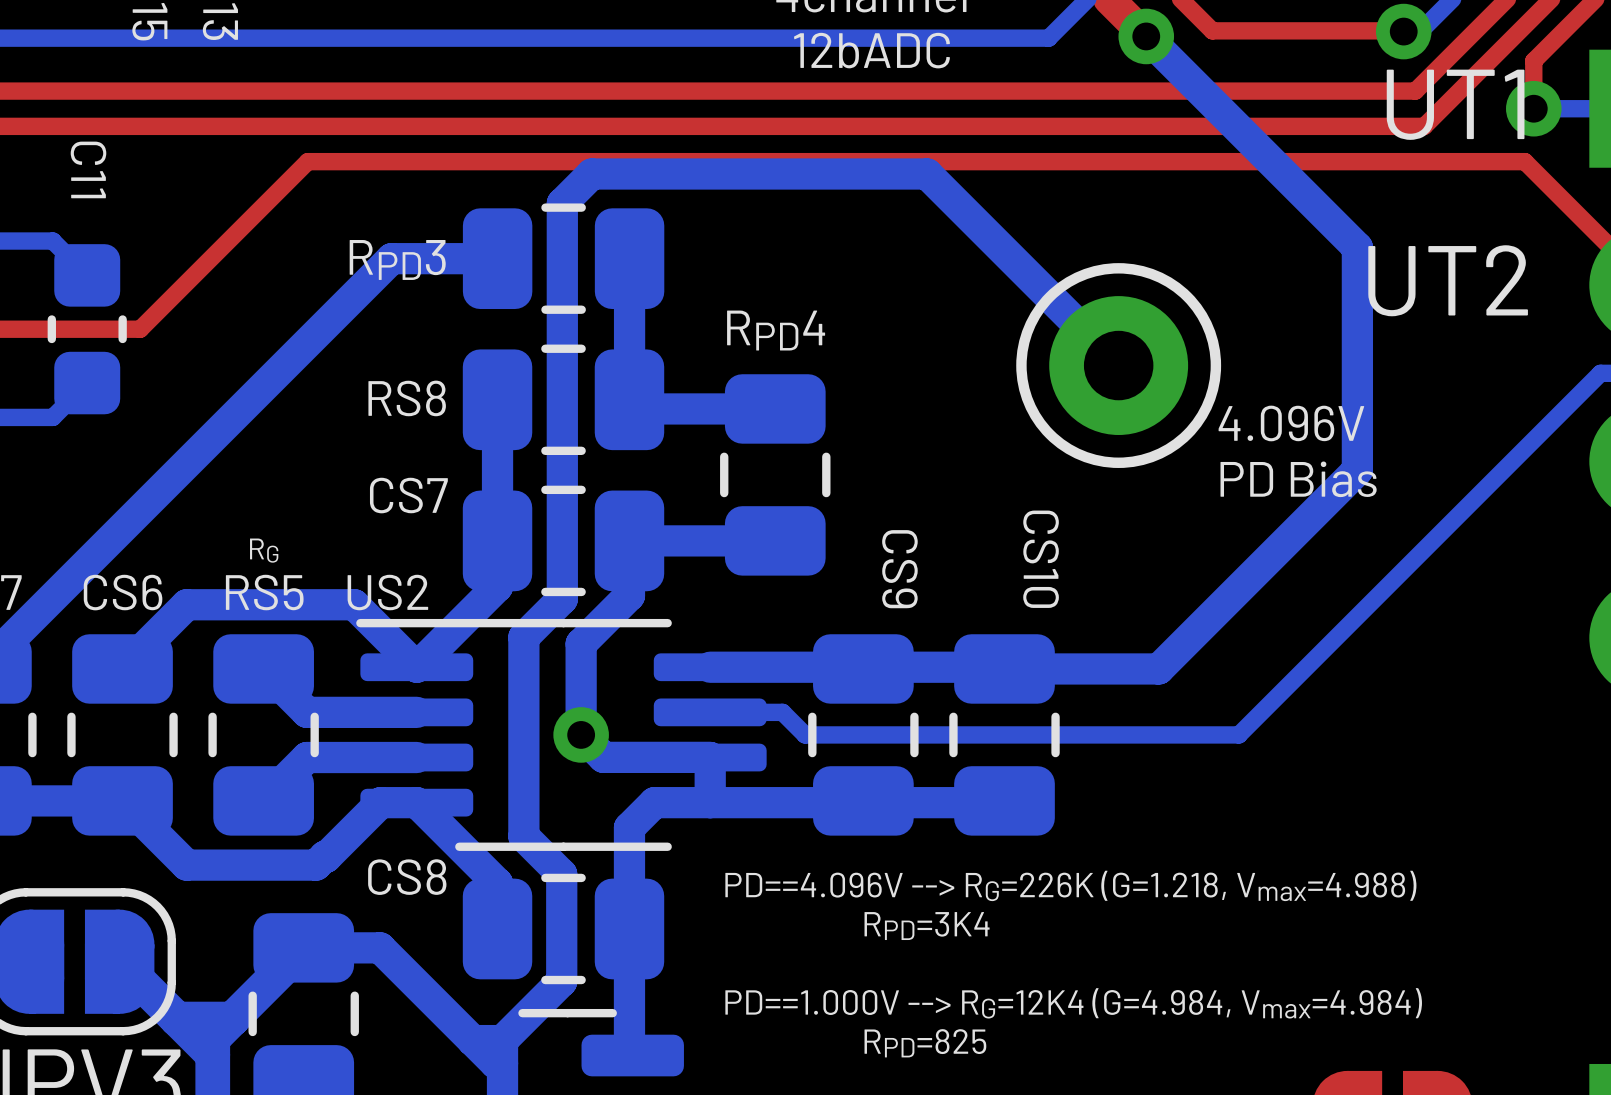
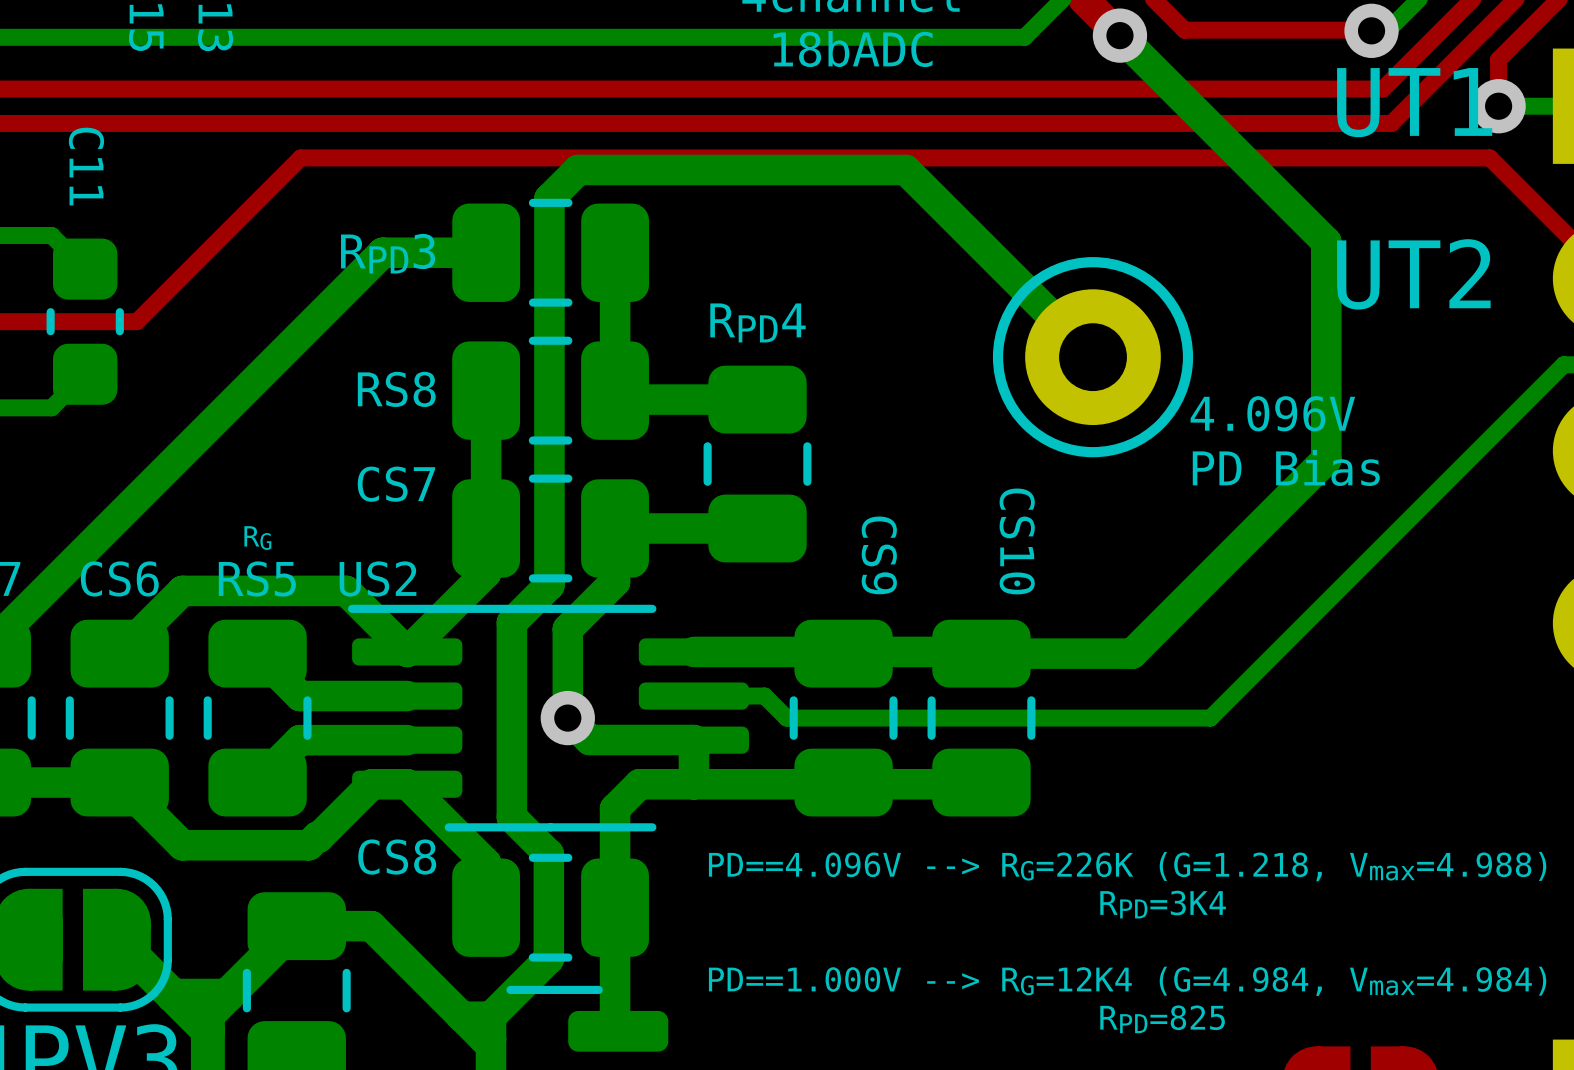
text: 12bADC (871, 50) -> 18bADC (853, 49)

